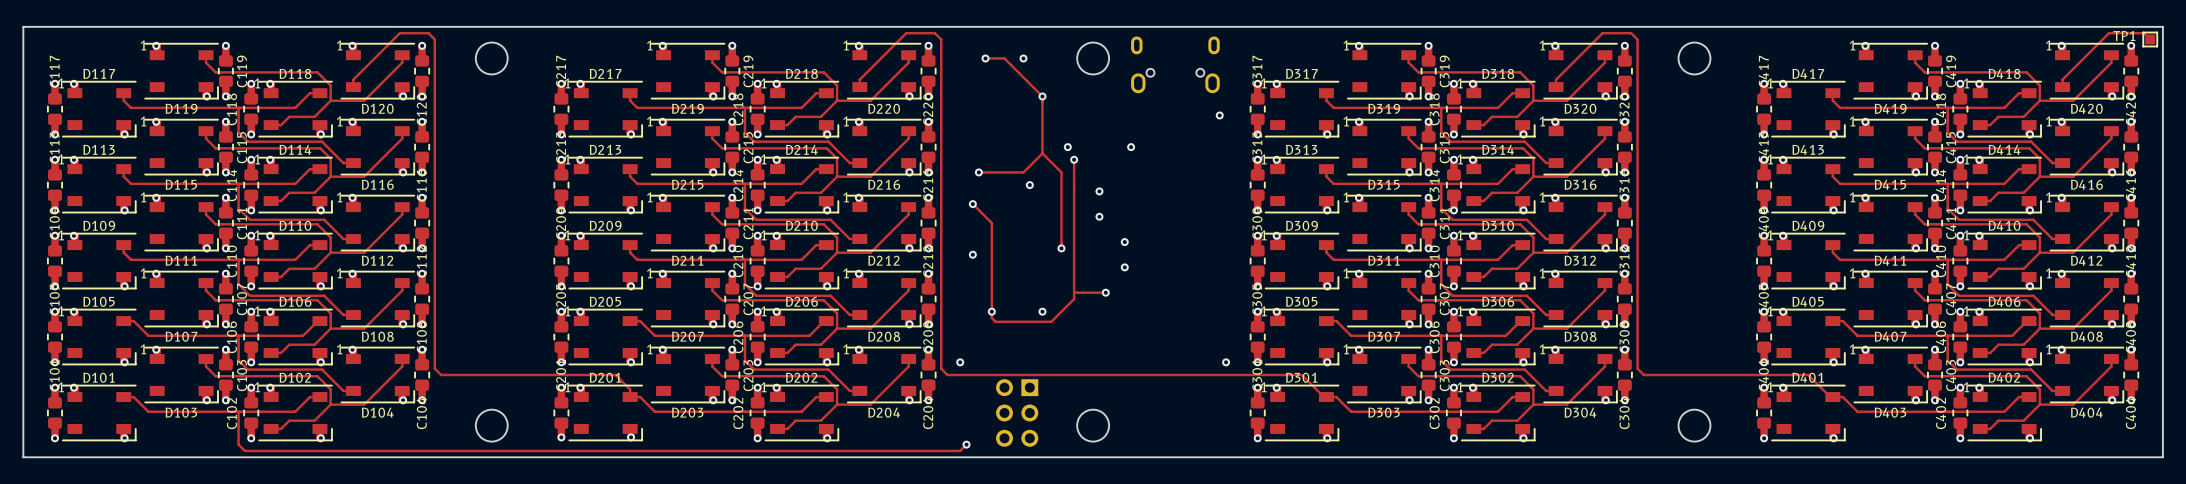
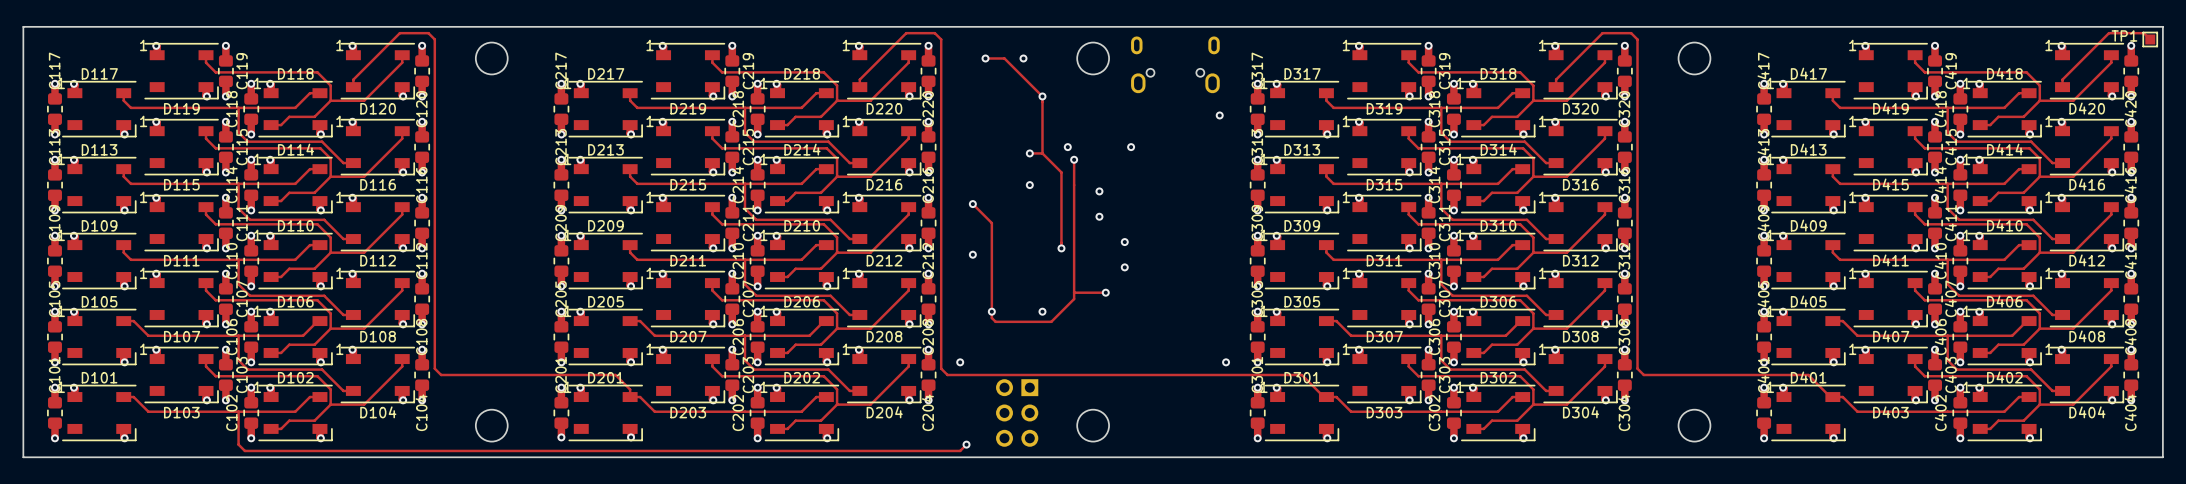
track: (1042, 153) (1023, 172) (978, 172) -> (1042, 153) (1029, 153)
via position: (978, 172) -> (1029, 153)

